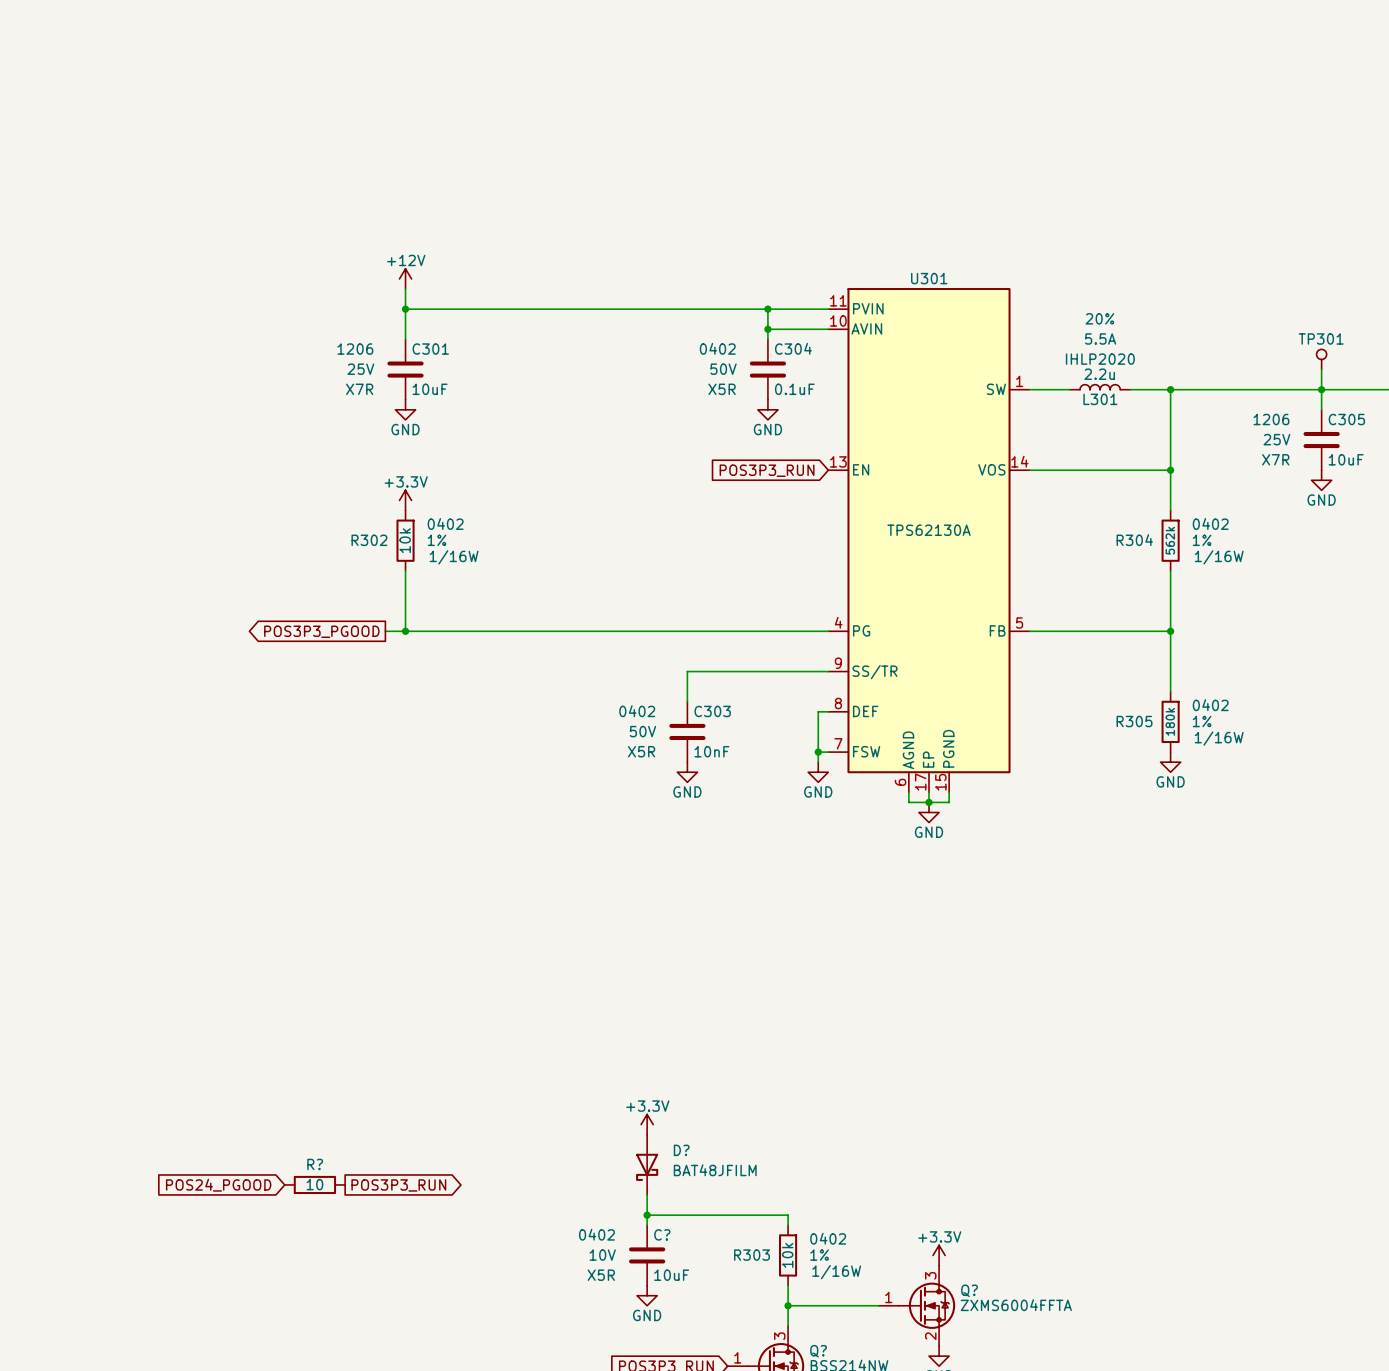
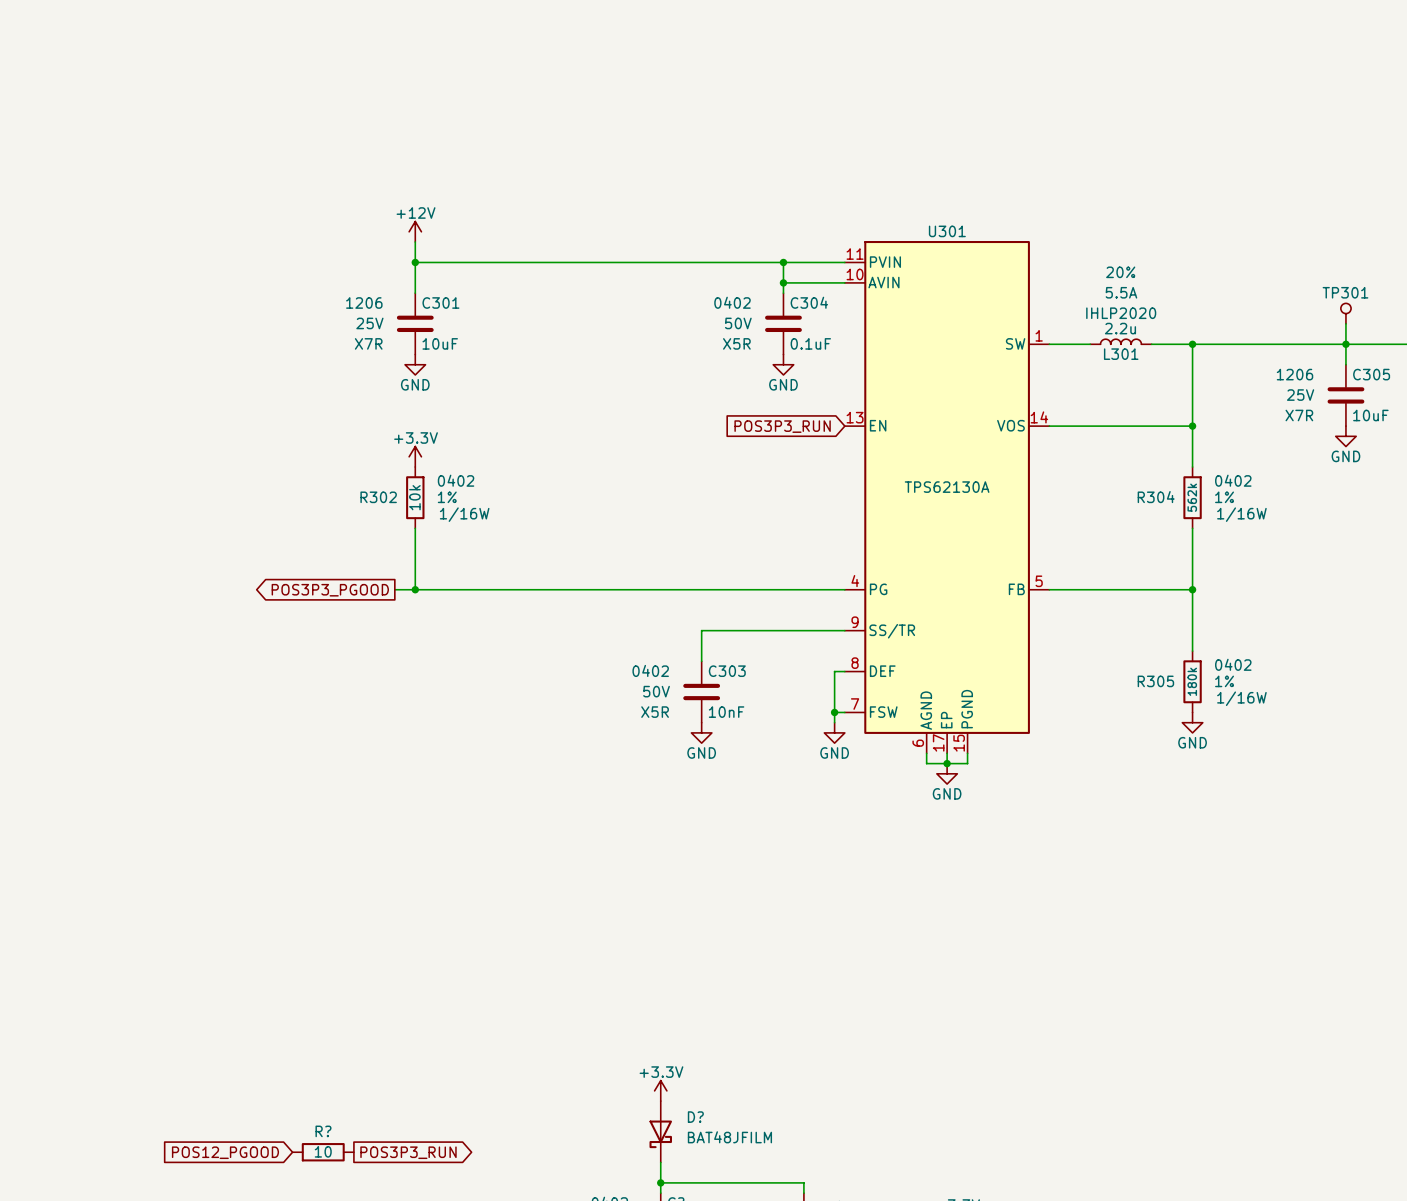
global label: POS24_PGOOD (218, 1185) -> POS12_PGOOD (225, 1152)

